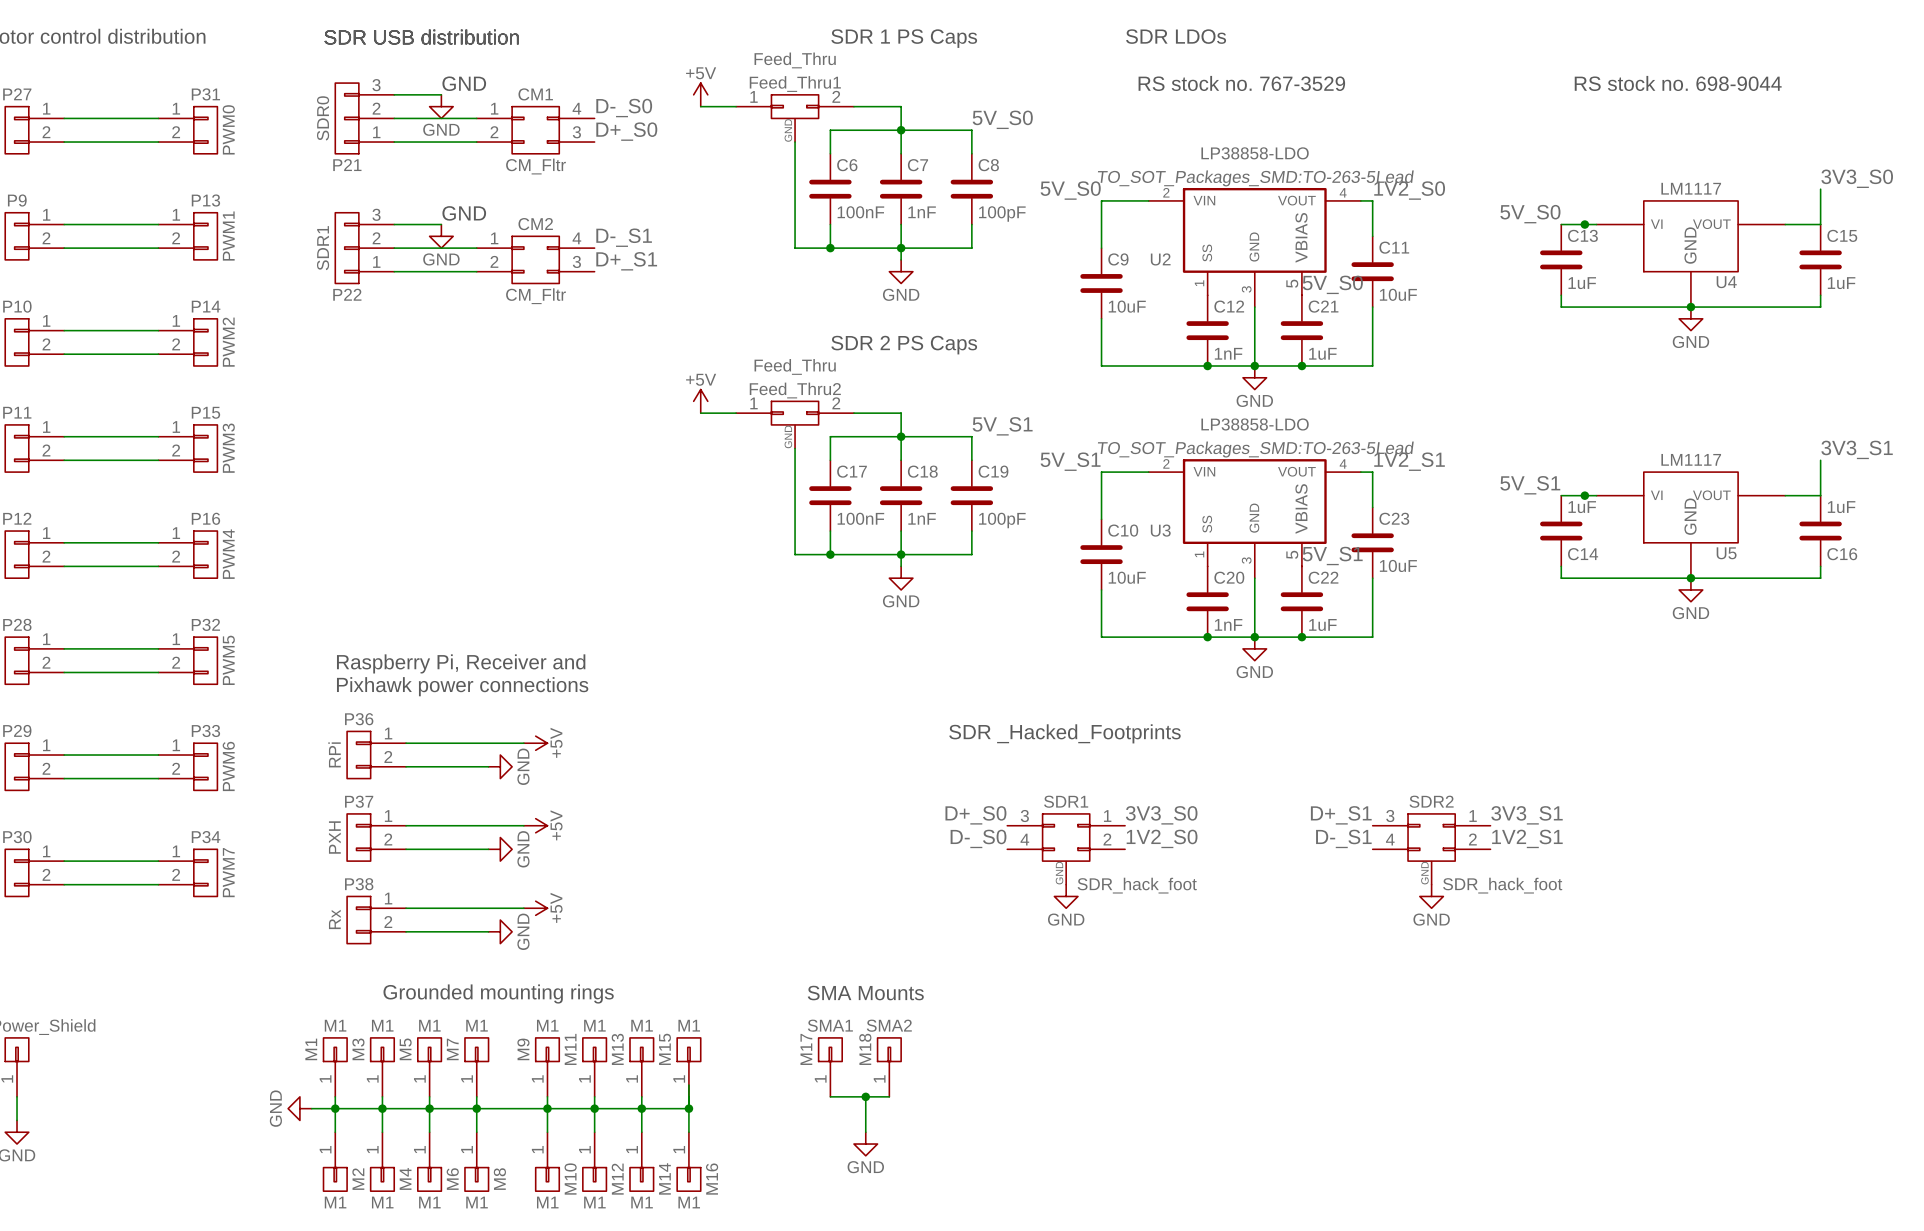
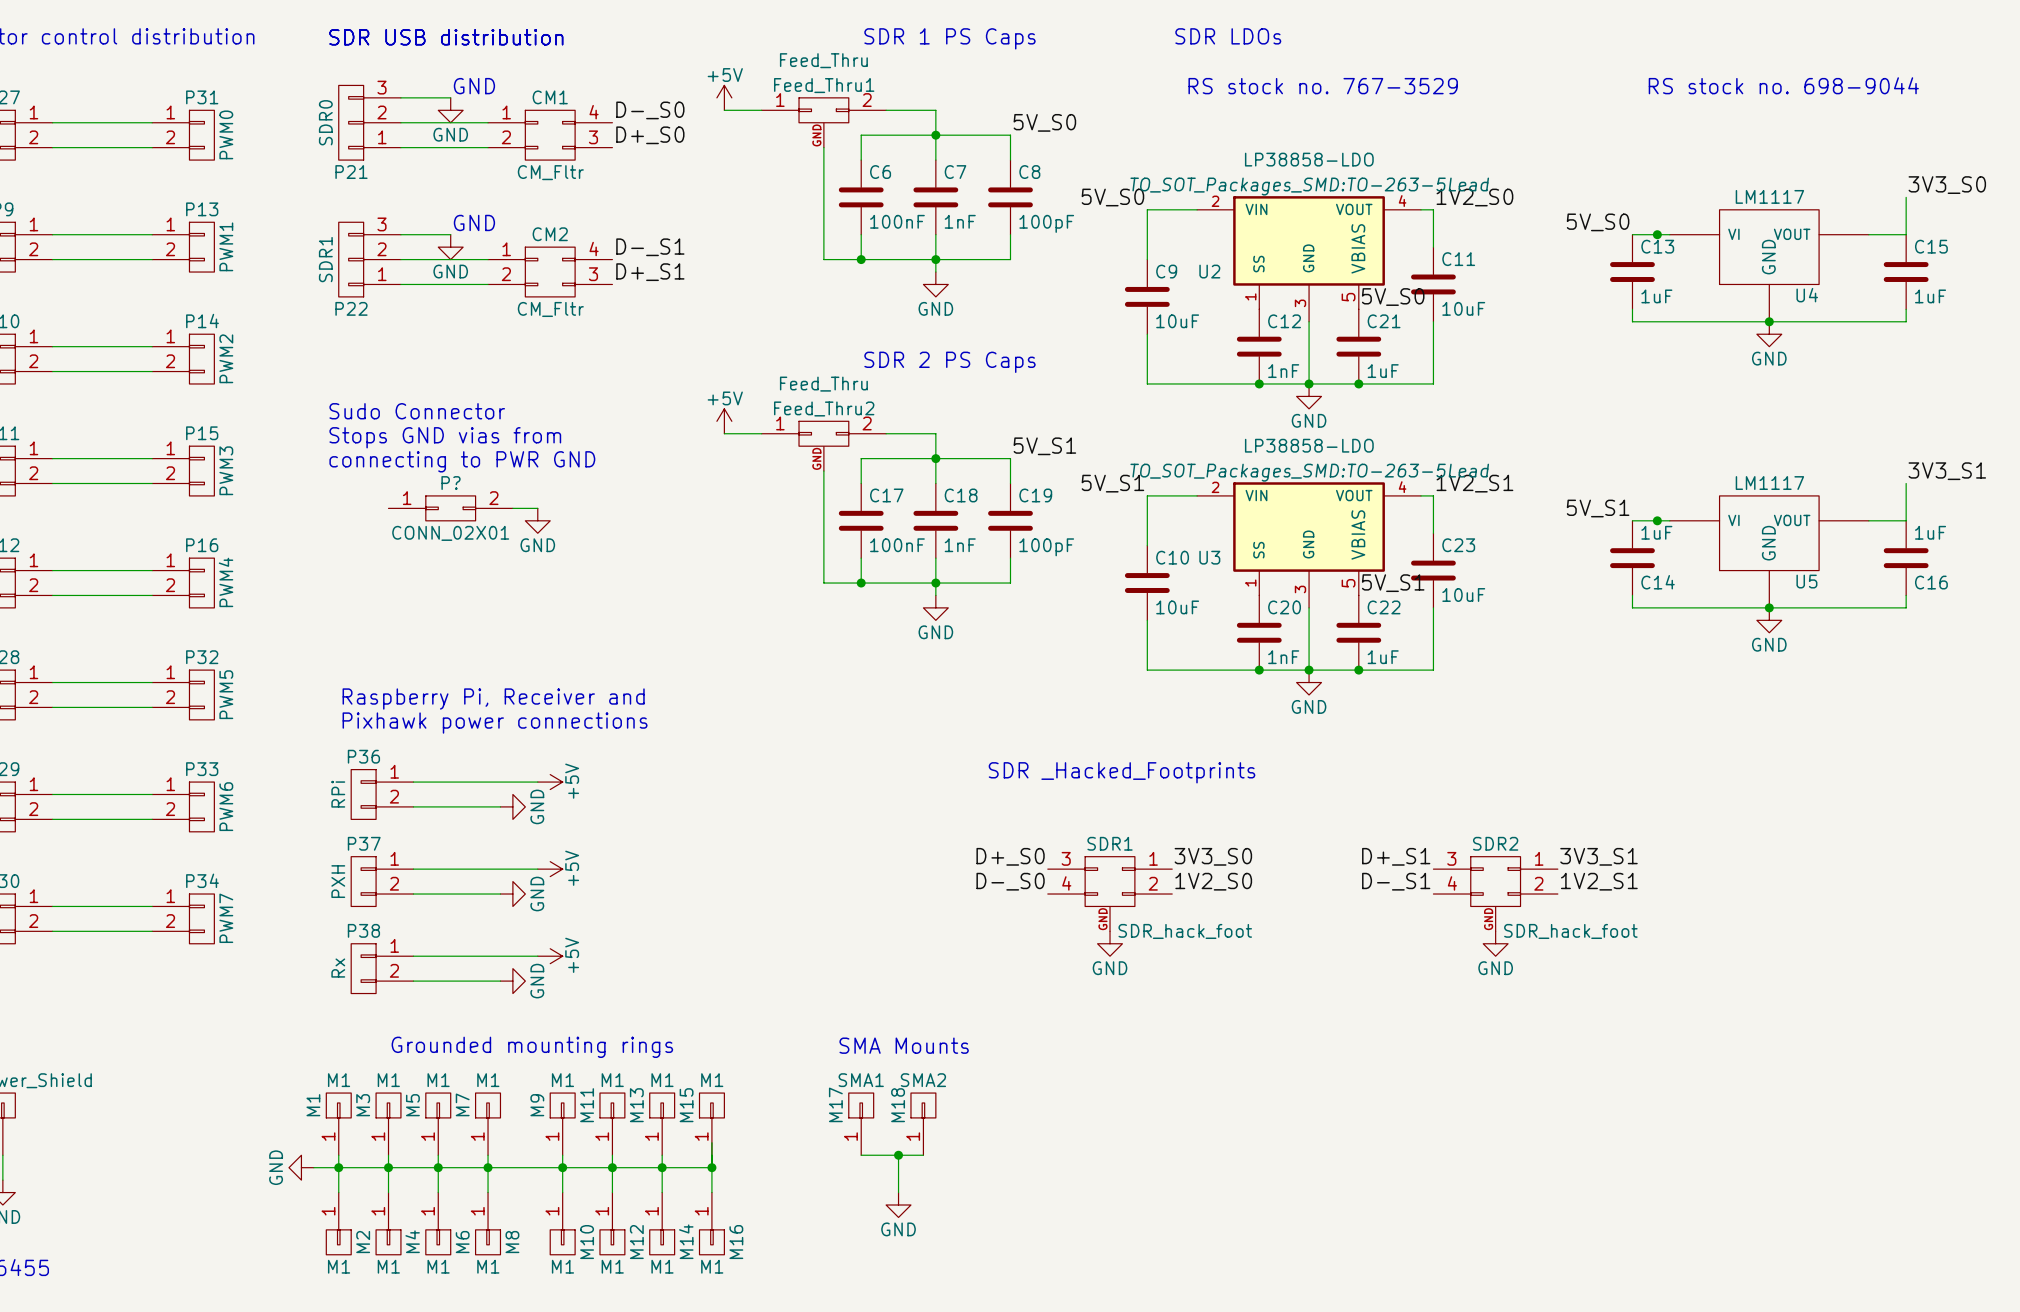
text: none -> Sudo Connector (417, 411)
text: none -> Stops GND vias from (445, 437)
text: none -> connecting to PWR GND (462, 461)
P?: none -> CONN_02X01 (450, 508)
wire: none -> (512, 508) (537, 508)
power symbol: none -> GND (537, 520)

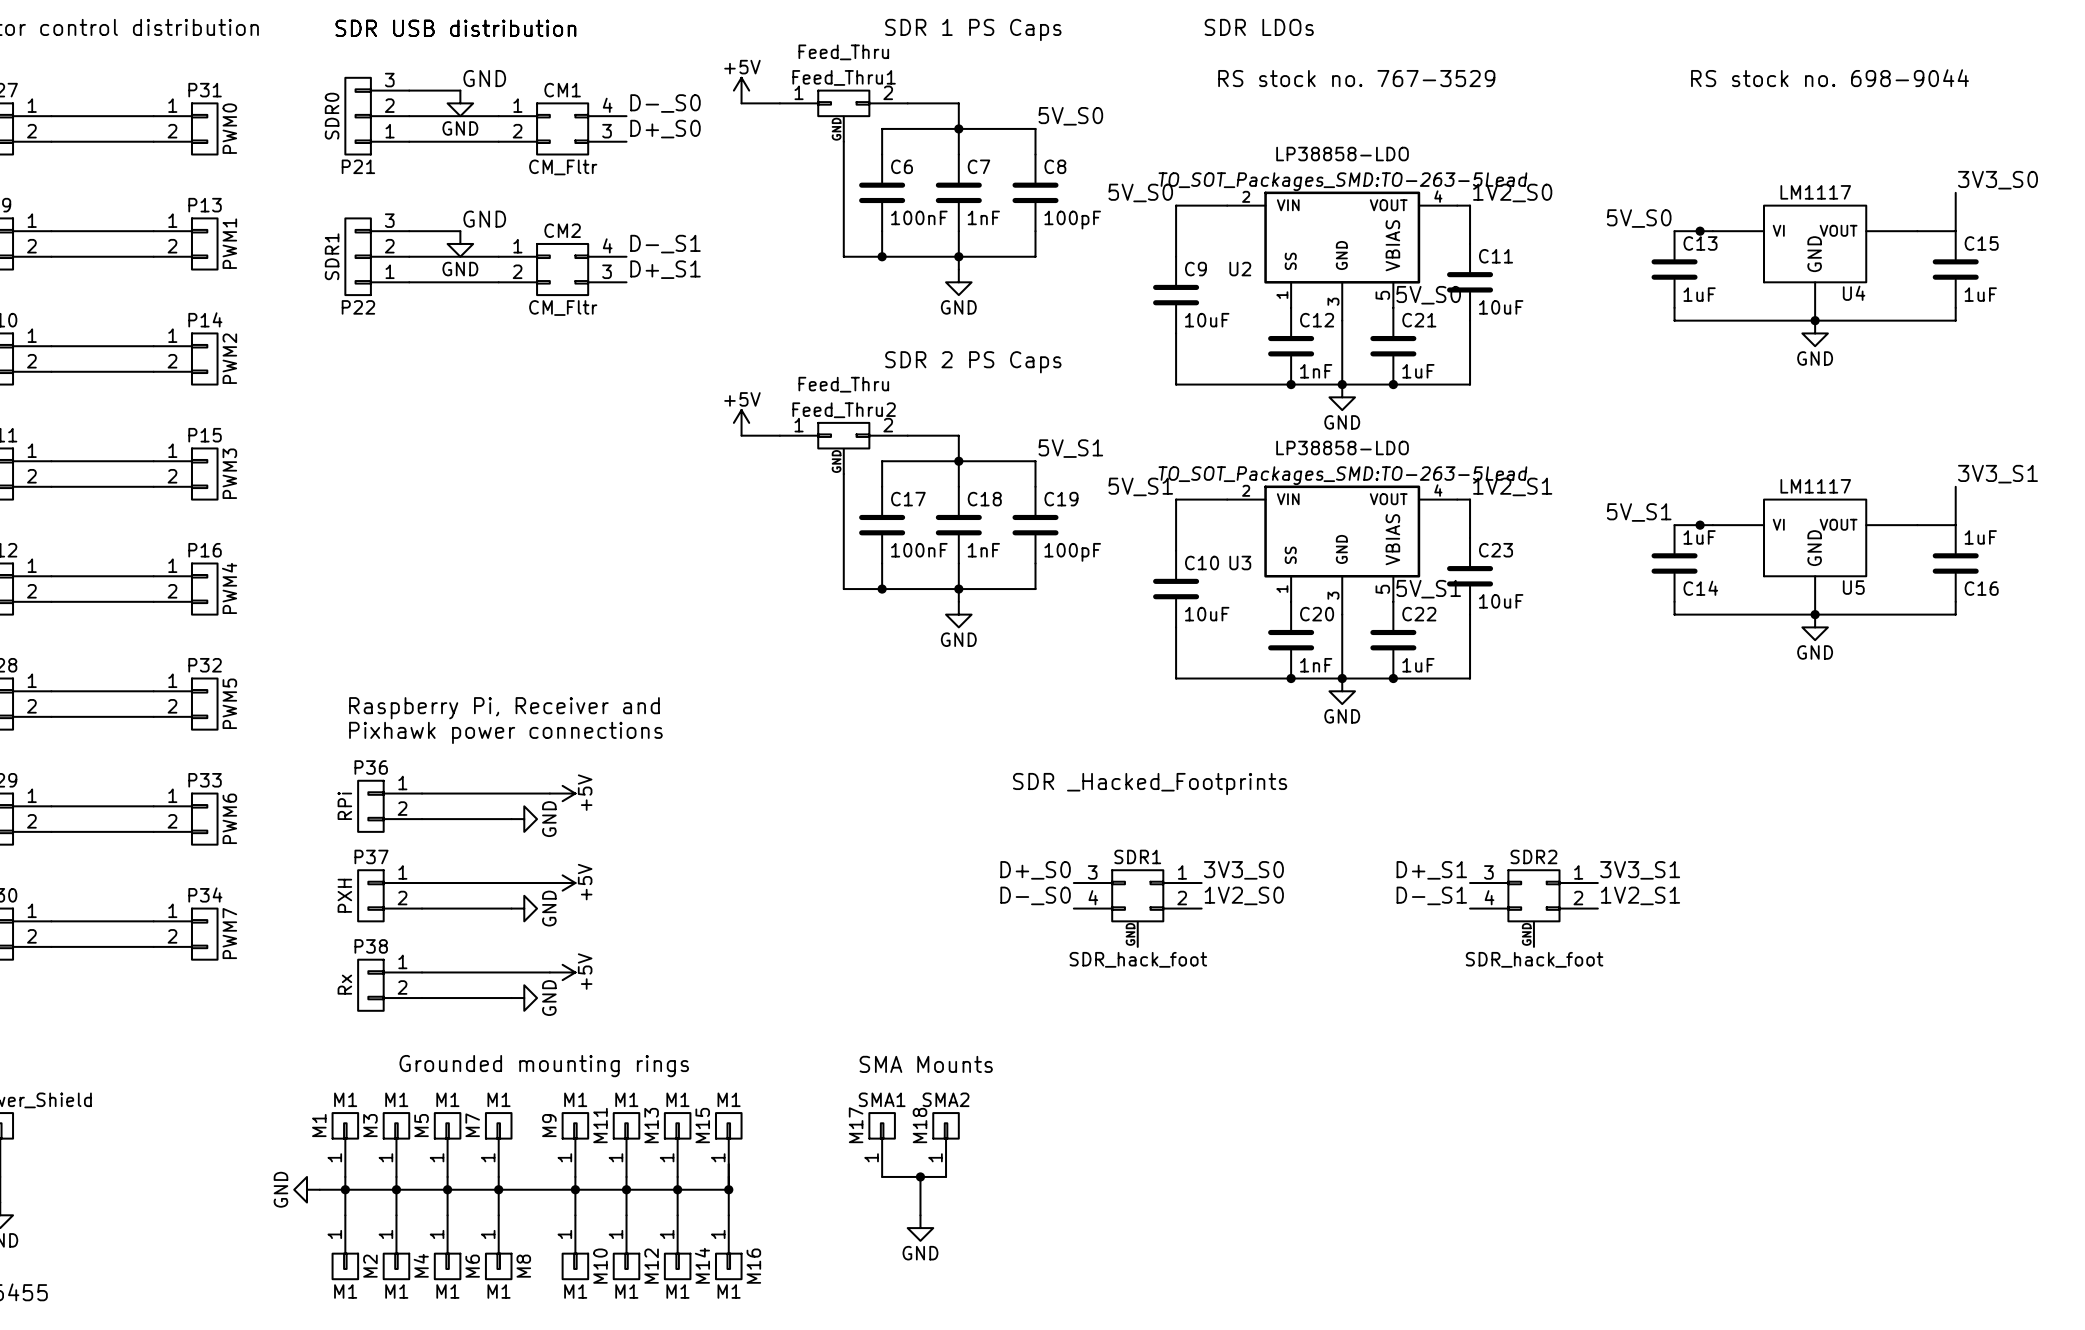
text: Sudo Connector (417, 411) -> none
text: Stops GND vias from (445, 437) -> none
text: connecting to PWR GND (462, 461) -> none
P?: CONN_02X01 (450, 508) -> none
wire: (512, 508) (537, 508) -> none
power symbol: GND (537, 520) -> none
SDR1 value position: SDR_hack_foot (1185, 931) -> SDR_hack_foot (1138, 959)
SDR2 value position: SDR_hack_foot (1570, 931) -> SDR_hack_foot (1534, 959)
power symbol: GND (1110, 943) -> none
power symbol: GND (1495, 943) -> none

